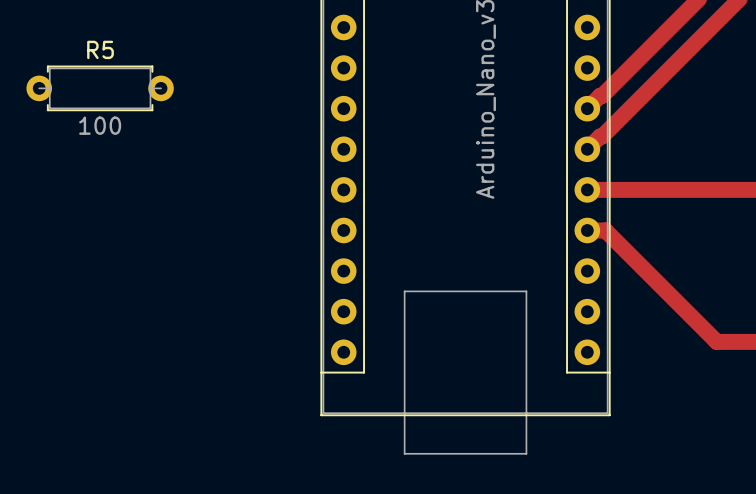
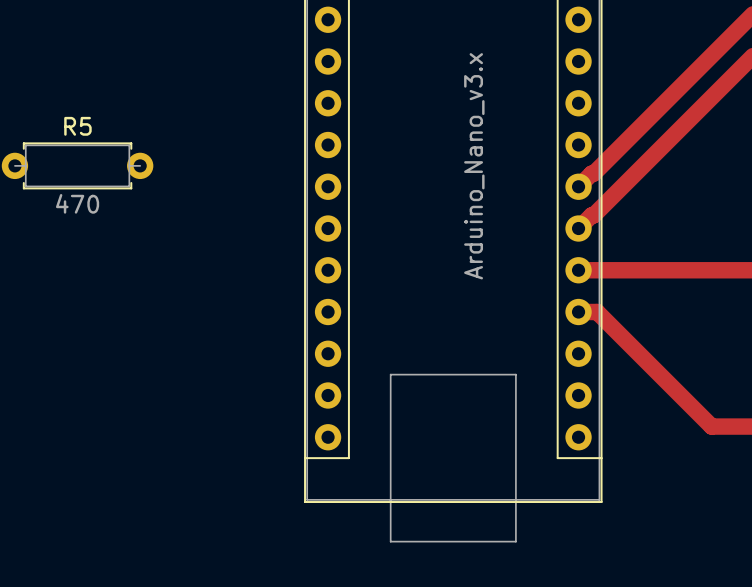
R5 value: 100 (100, 125) -> 470 (77, 203)

